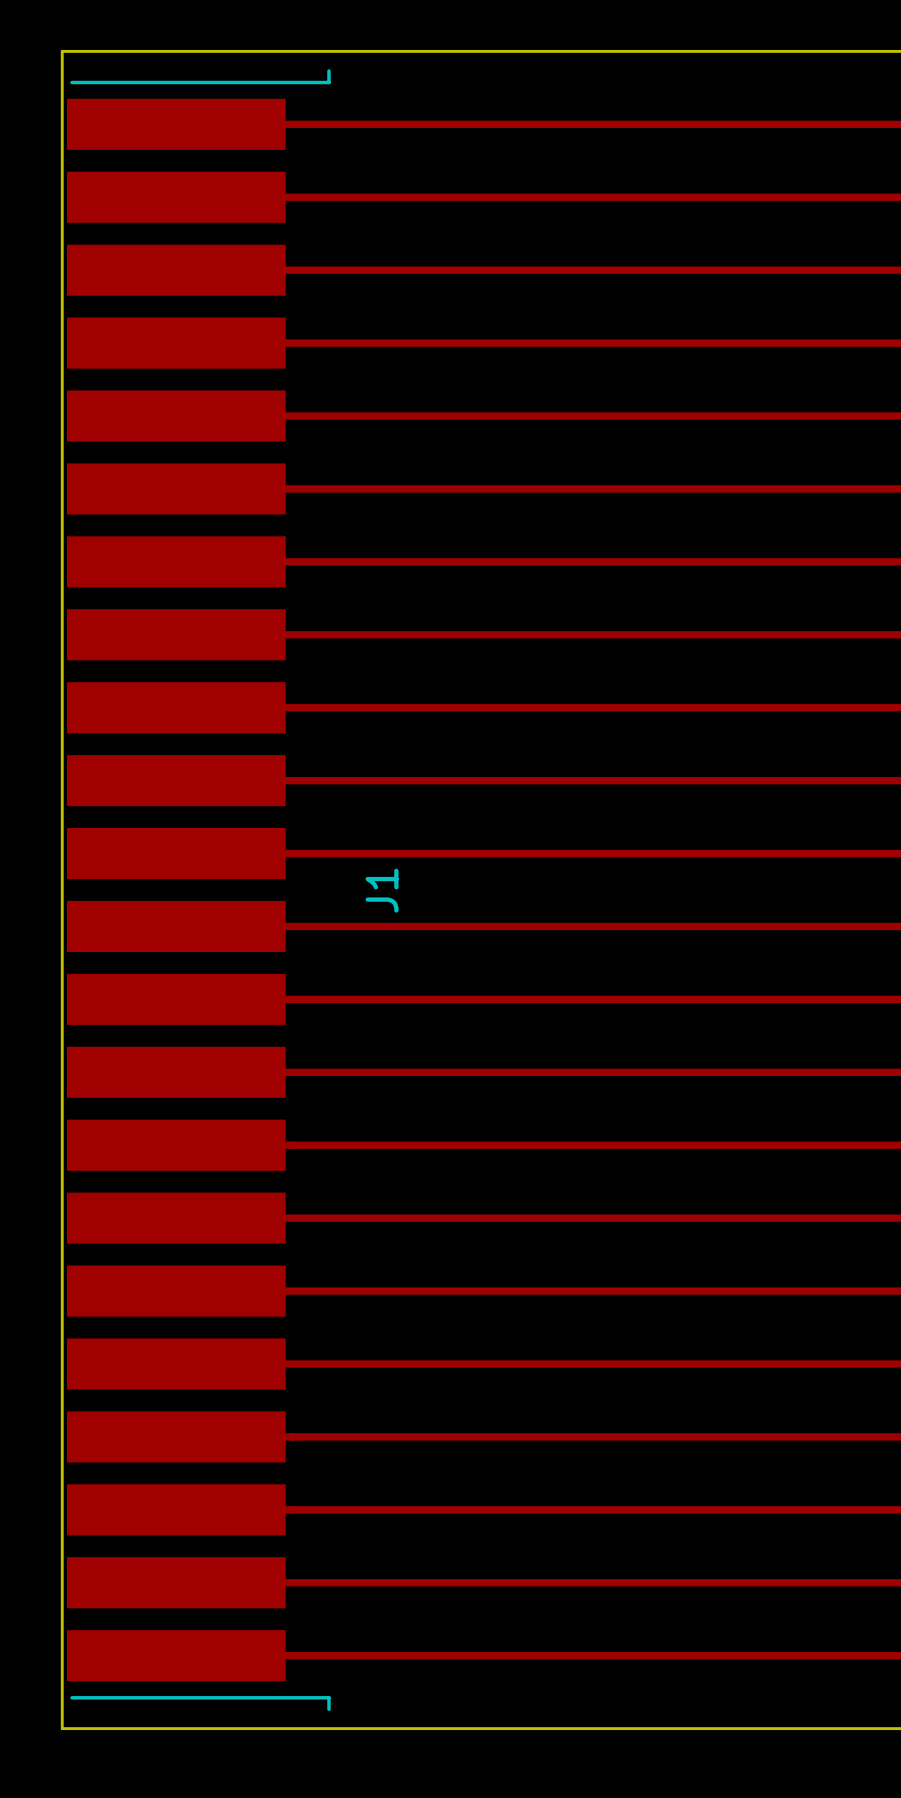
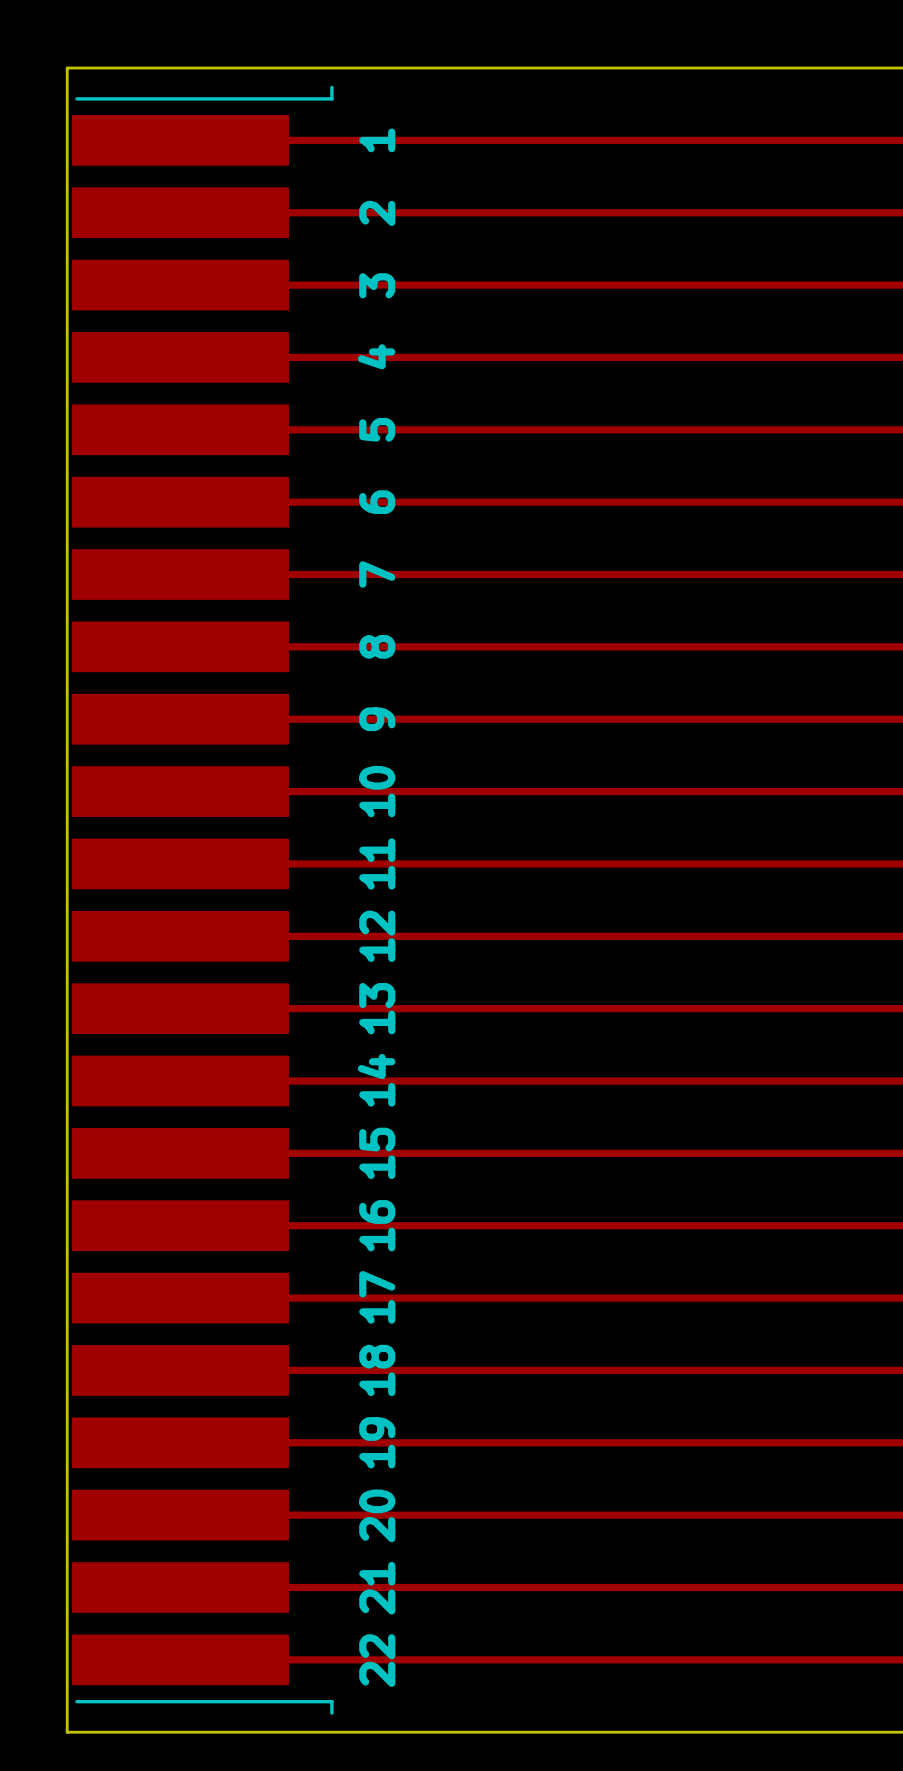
text: none -> 1 (377, 140)
text: none -> 2 (377, 213)
text: none -> 3 (377, 285)
text: none -> 4 (376, 356)
text: none -> 5 (377, 429)
text: none -> 6 (377, 502)
text: none -> 7 (377, 574)
text: none -> 8 (377, 646)
text: none -> 9 (377, 719)
text: none -> 10 (377, 791)
text: none -> 11 (377, 863)
J1 name: J1 (382, 890) -> none
text: none -> 12 (377, 936)
text: none -> 13 (377, 1008)
text: none -> 14 (376, 1080)
text: none -> 15 (377, 1153)
text: none -> 16 (377, 1225)
text: none -> 17 (377, 1297)
text: none -> 18 (377, 1370)
text: none -> 19 (377, 1442)
text: none -> 20 (377, 1515)
text: none -> 21 (377, 1588)
text: none -> 22 (377, 1660)

